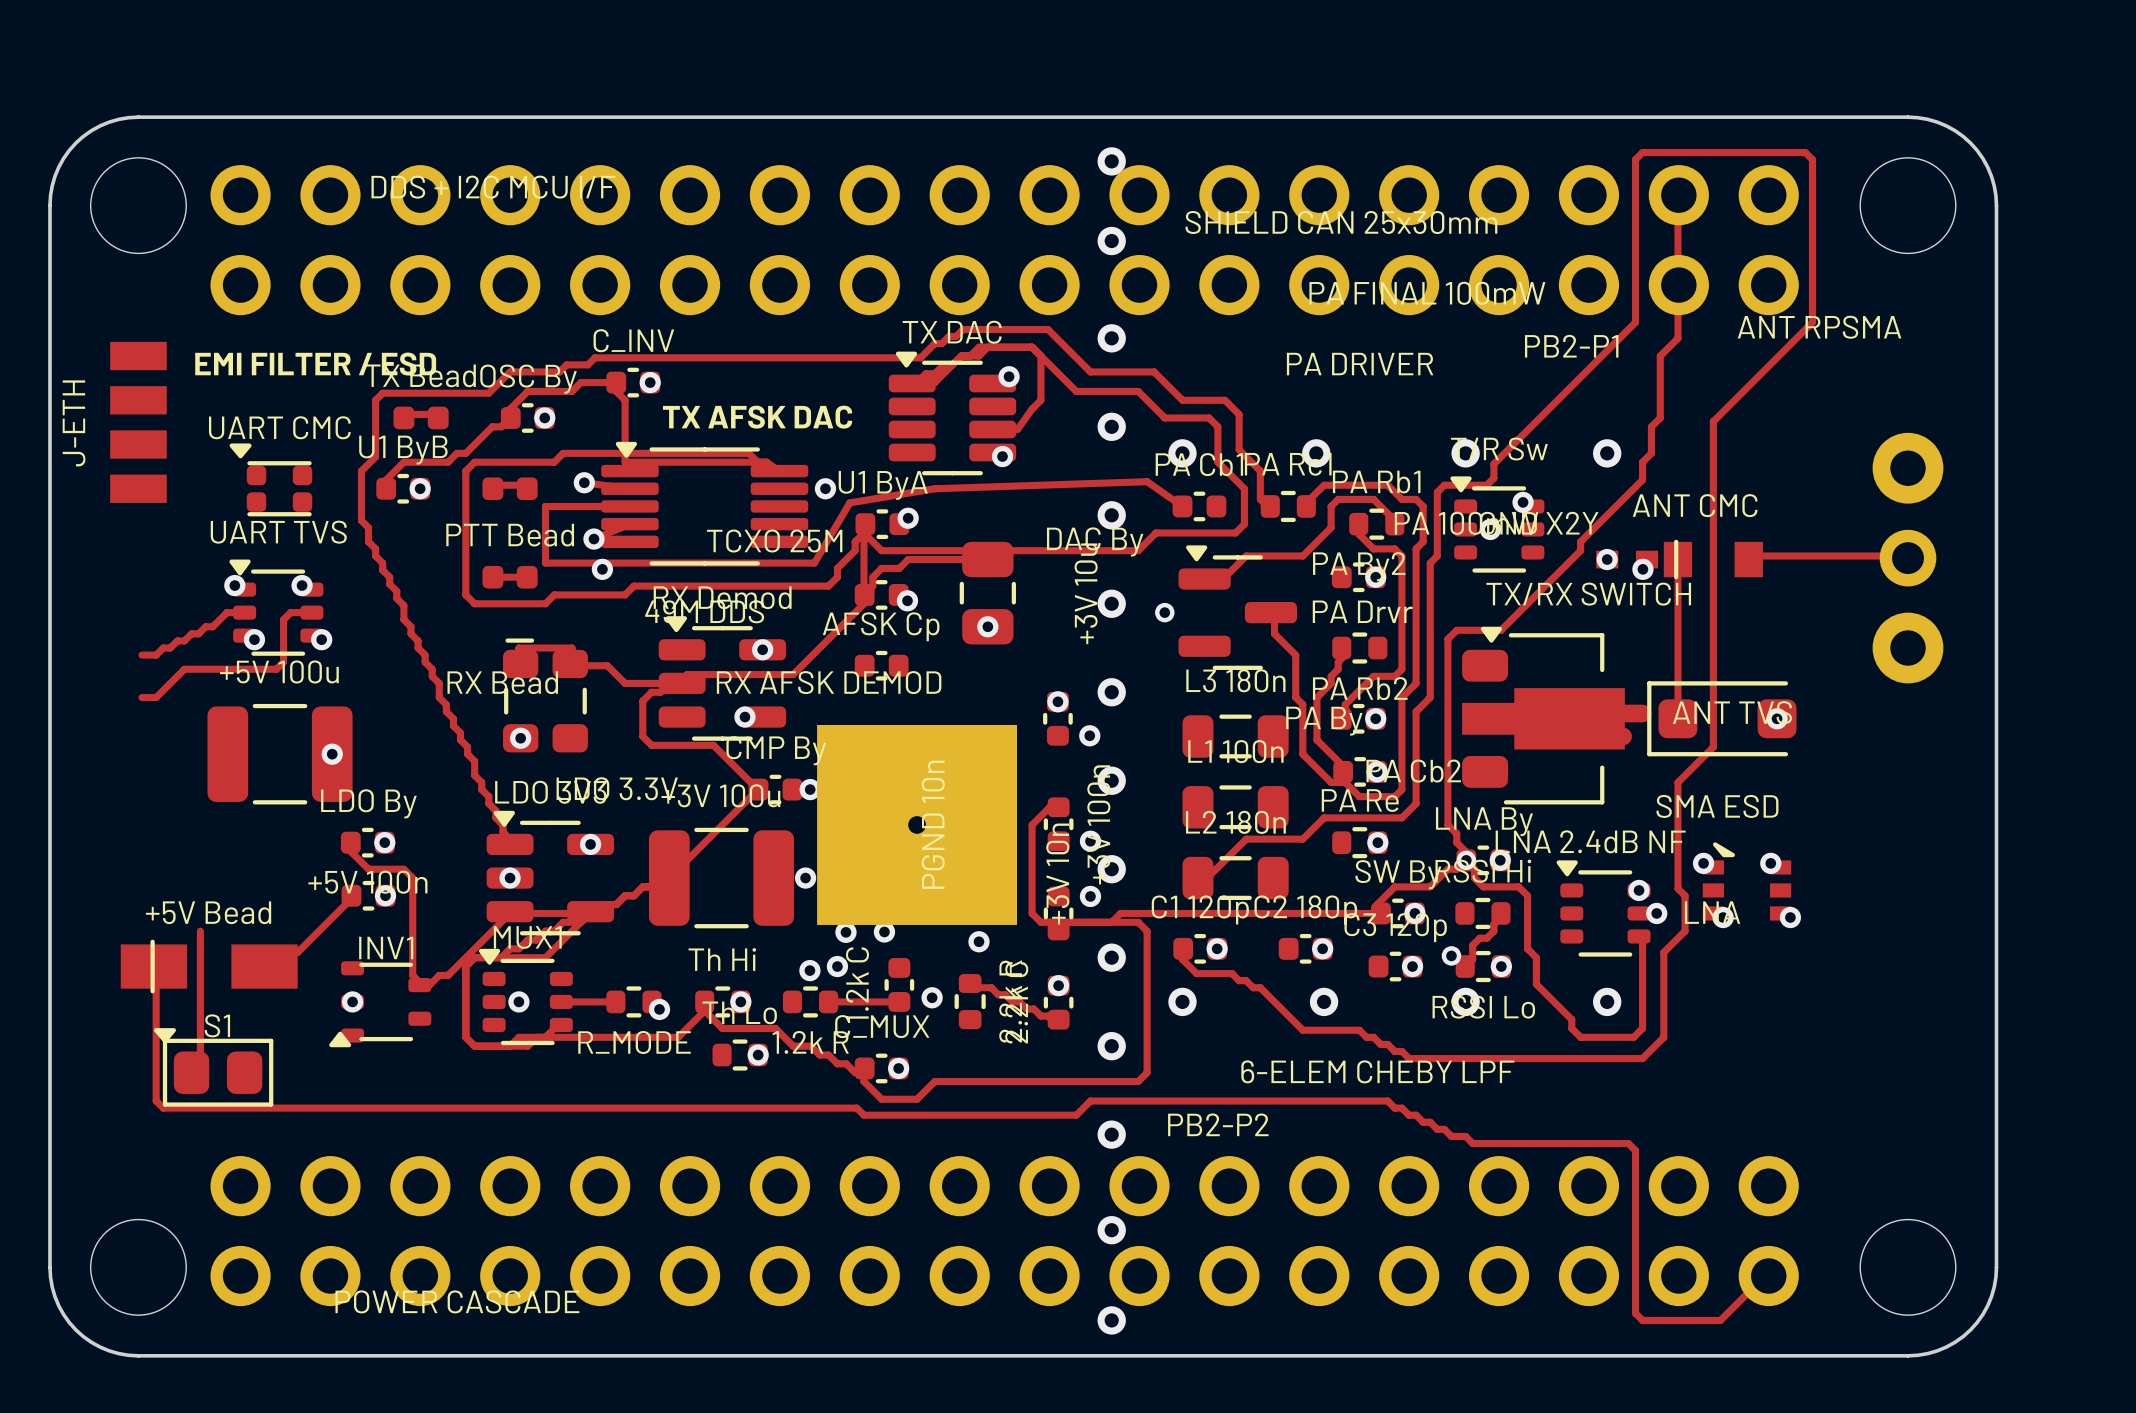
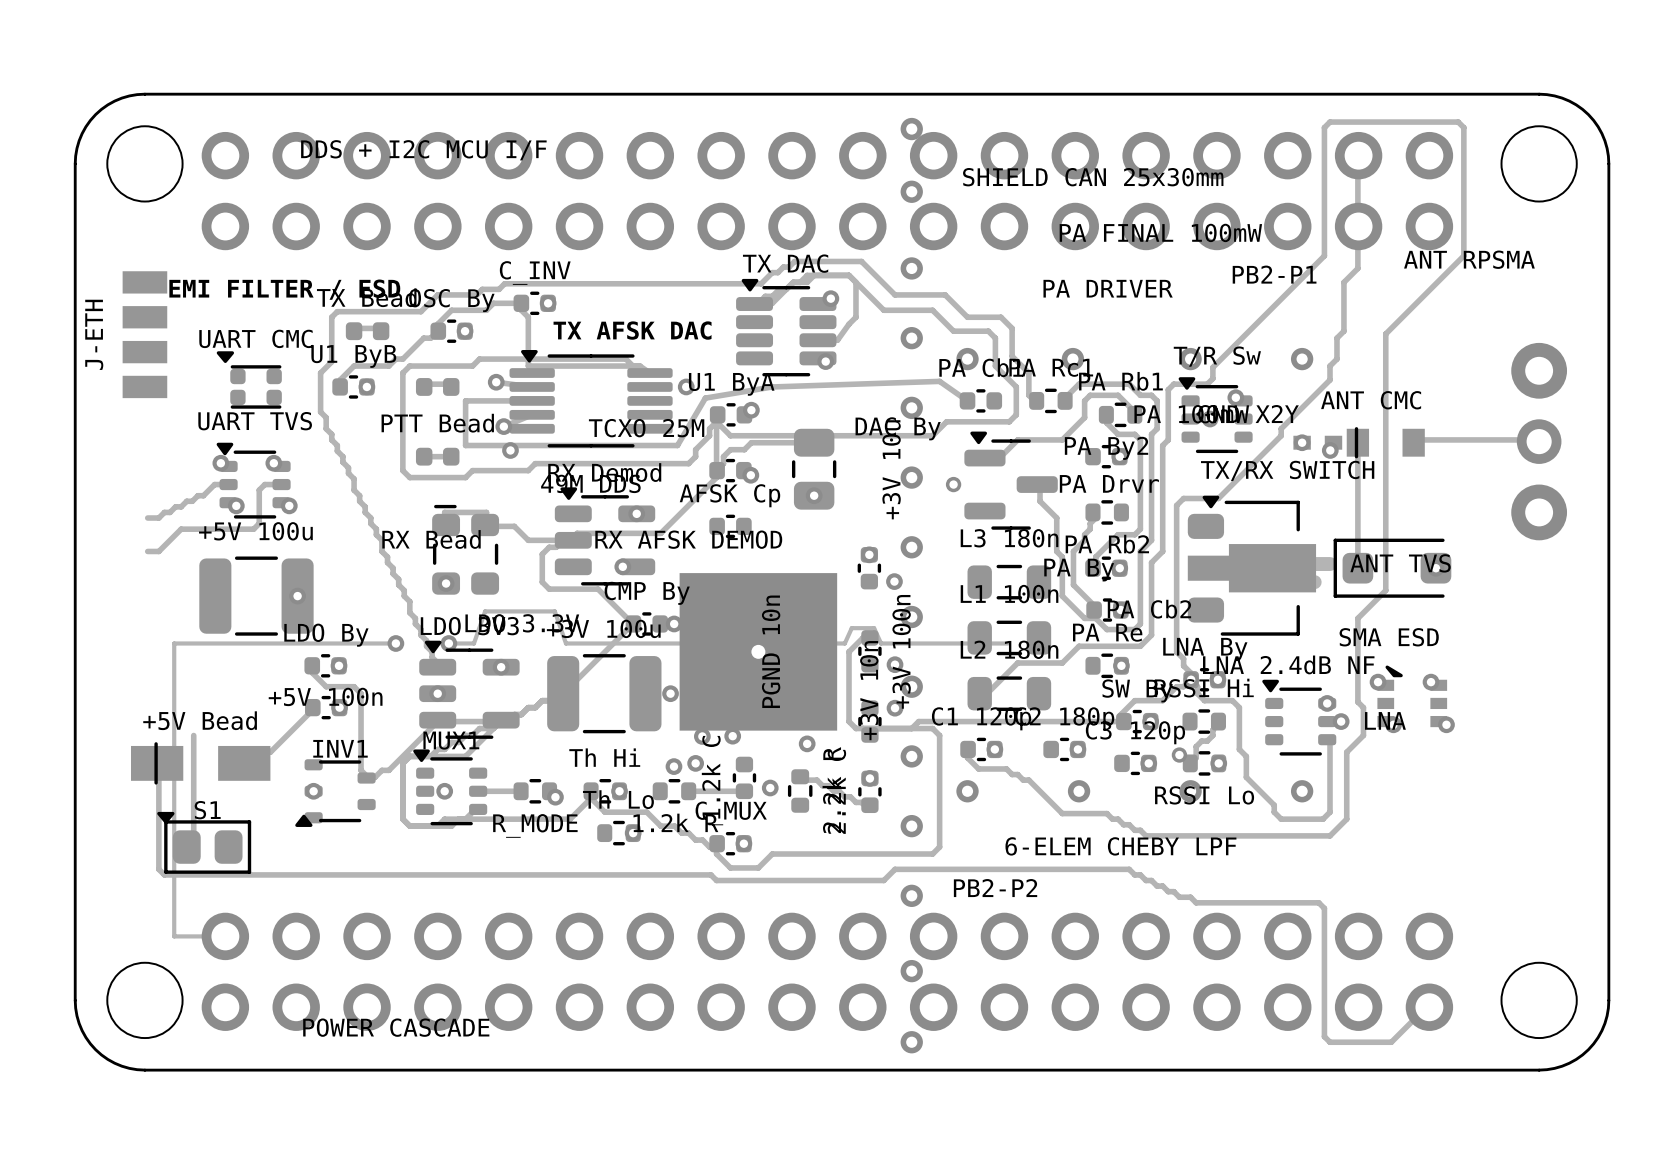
track: none -> (395, 643) (174, 643) (174, 936) (225, 936)
via: none -> (395, 643)
track: none -> (448, 643) (473, 643) (485, 611) (554, 611) (565, 643) (844, 643) (851, 628) (874, 628) (881, 643) (1007, 643)
via: none -> (448, 643)

